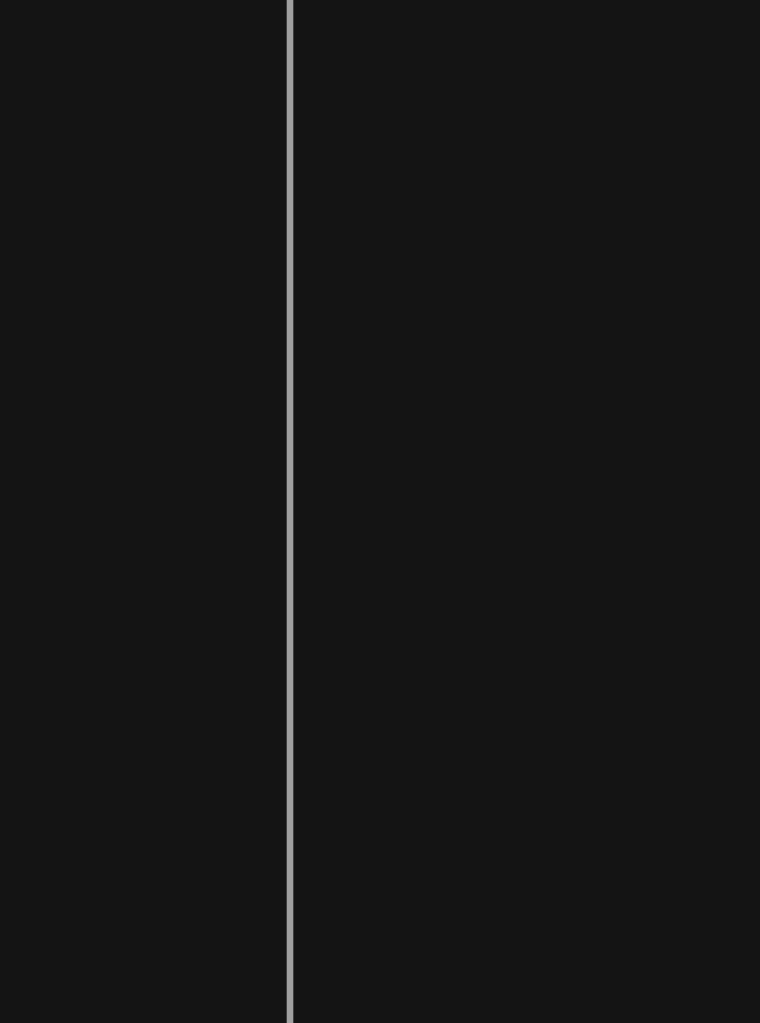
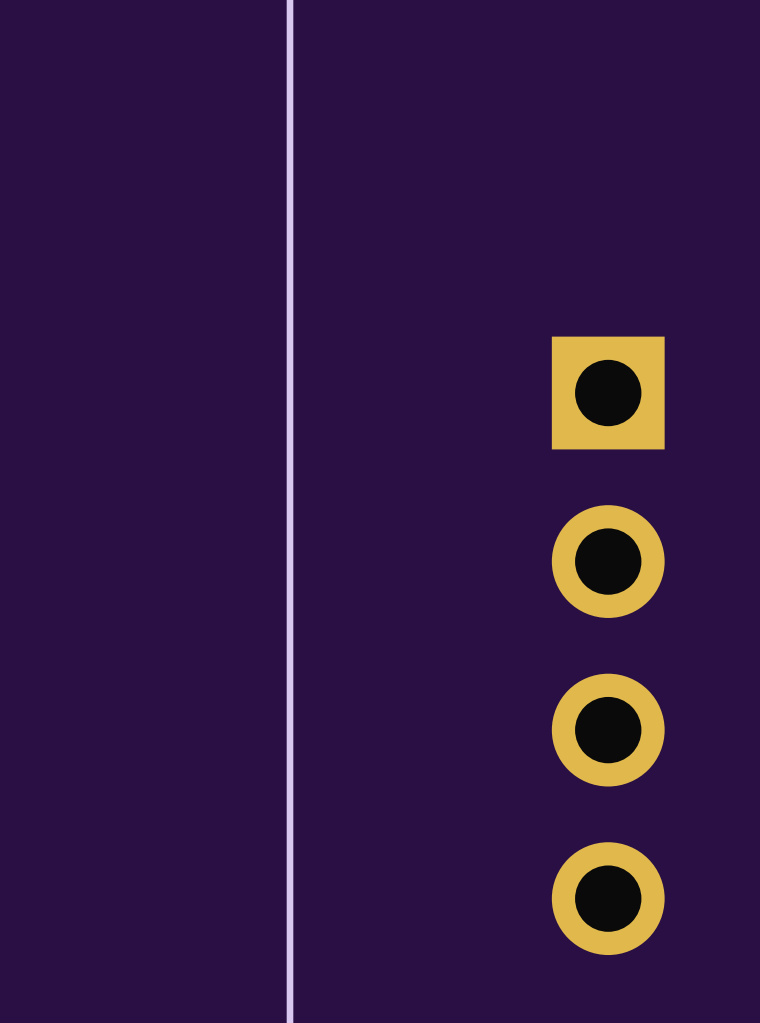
part: none -> (608, 645)

